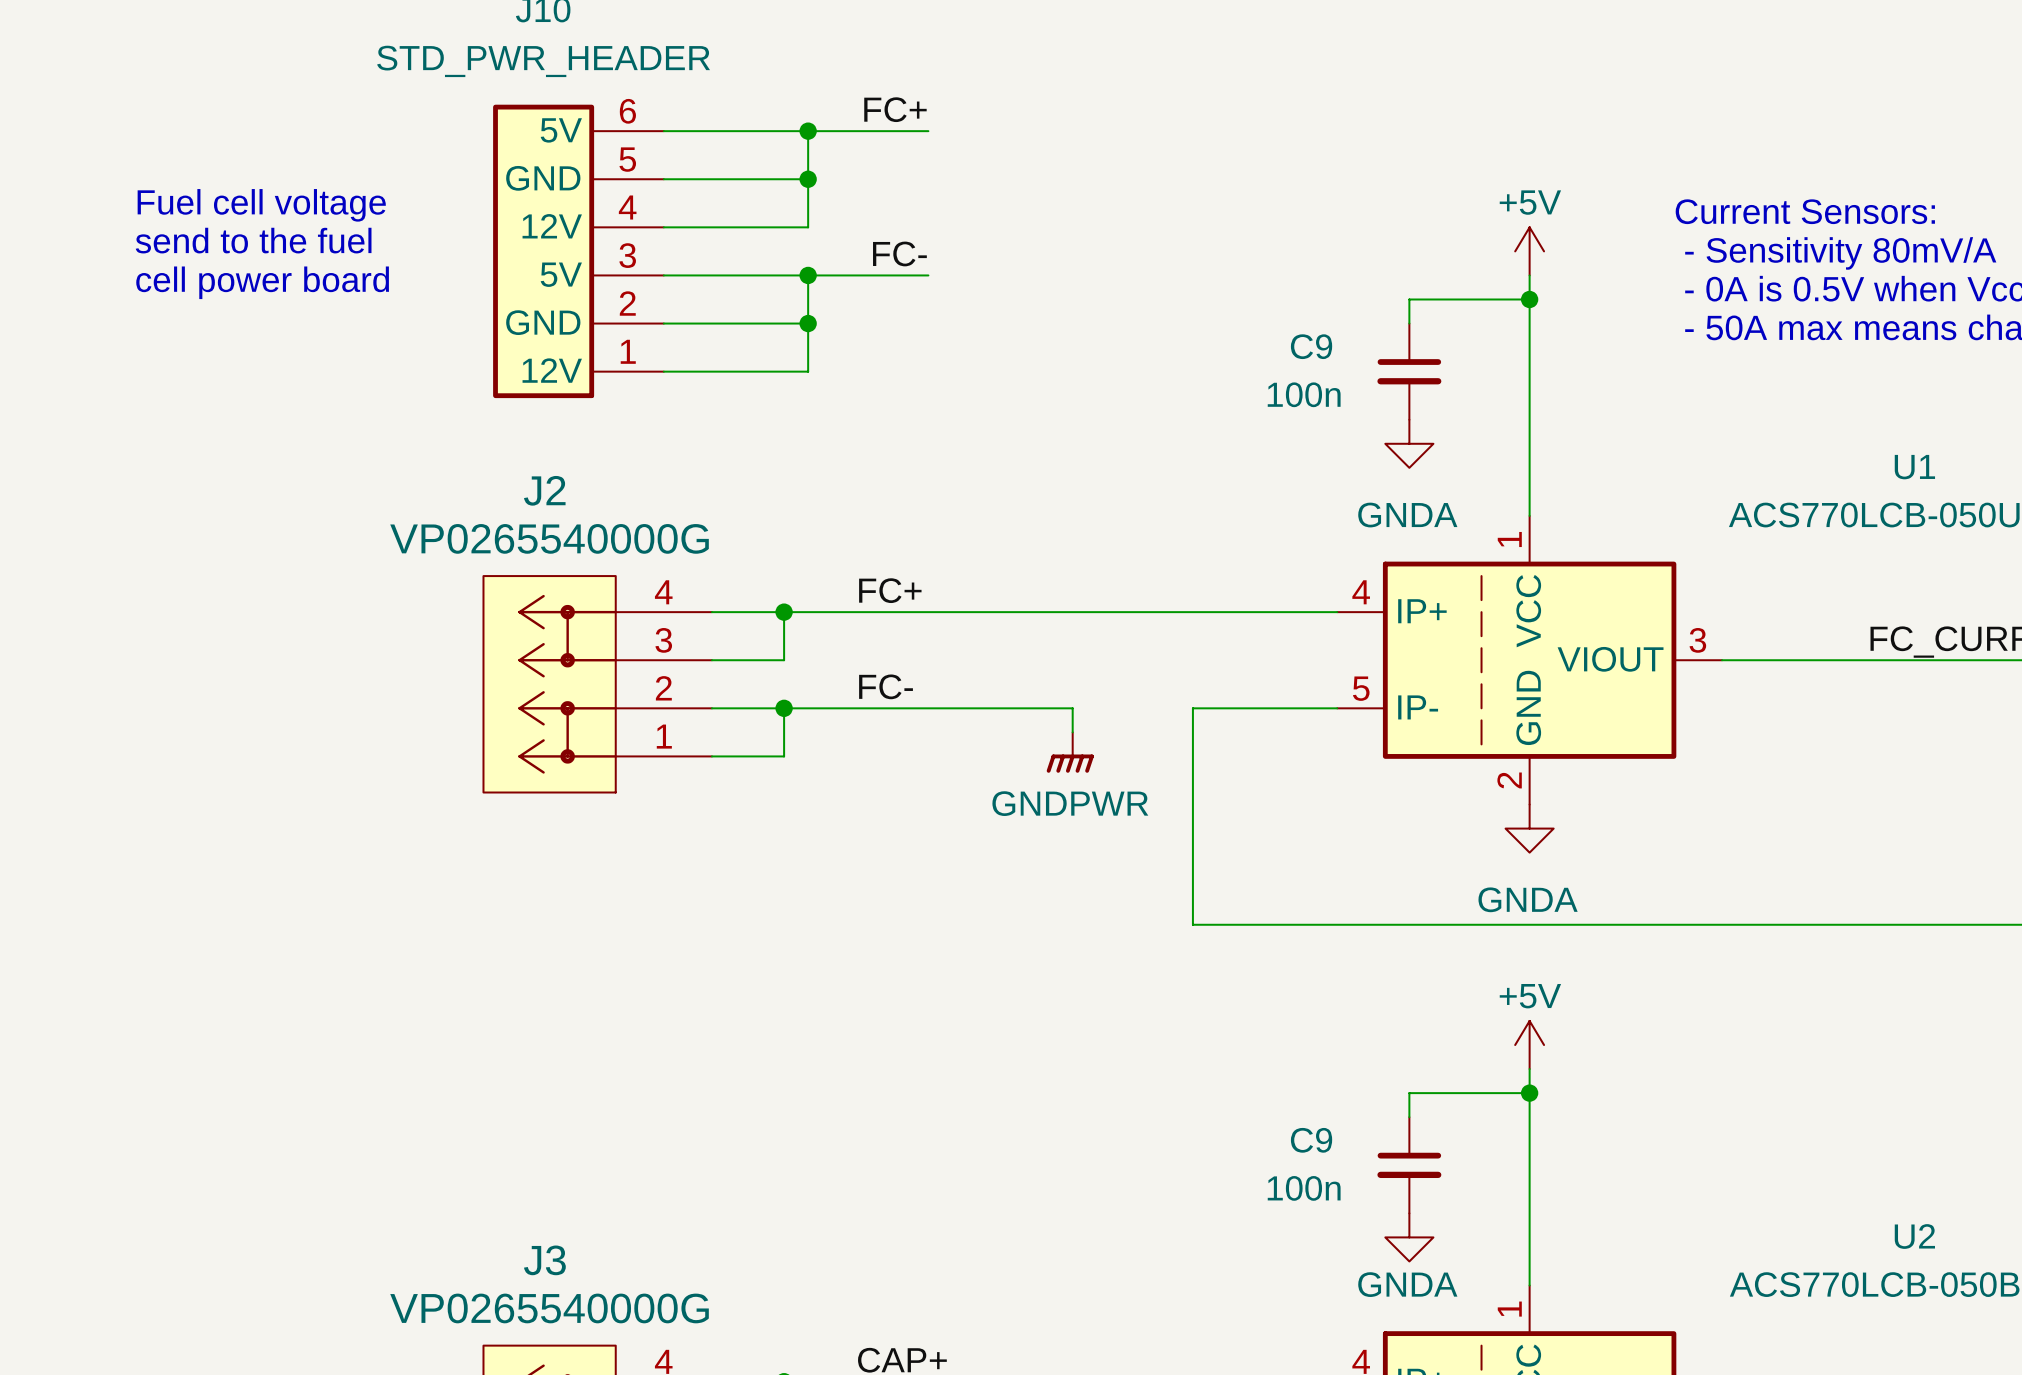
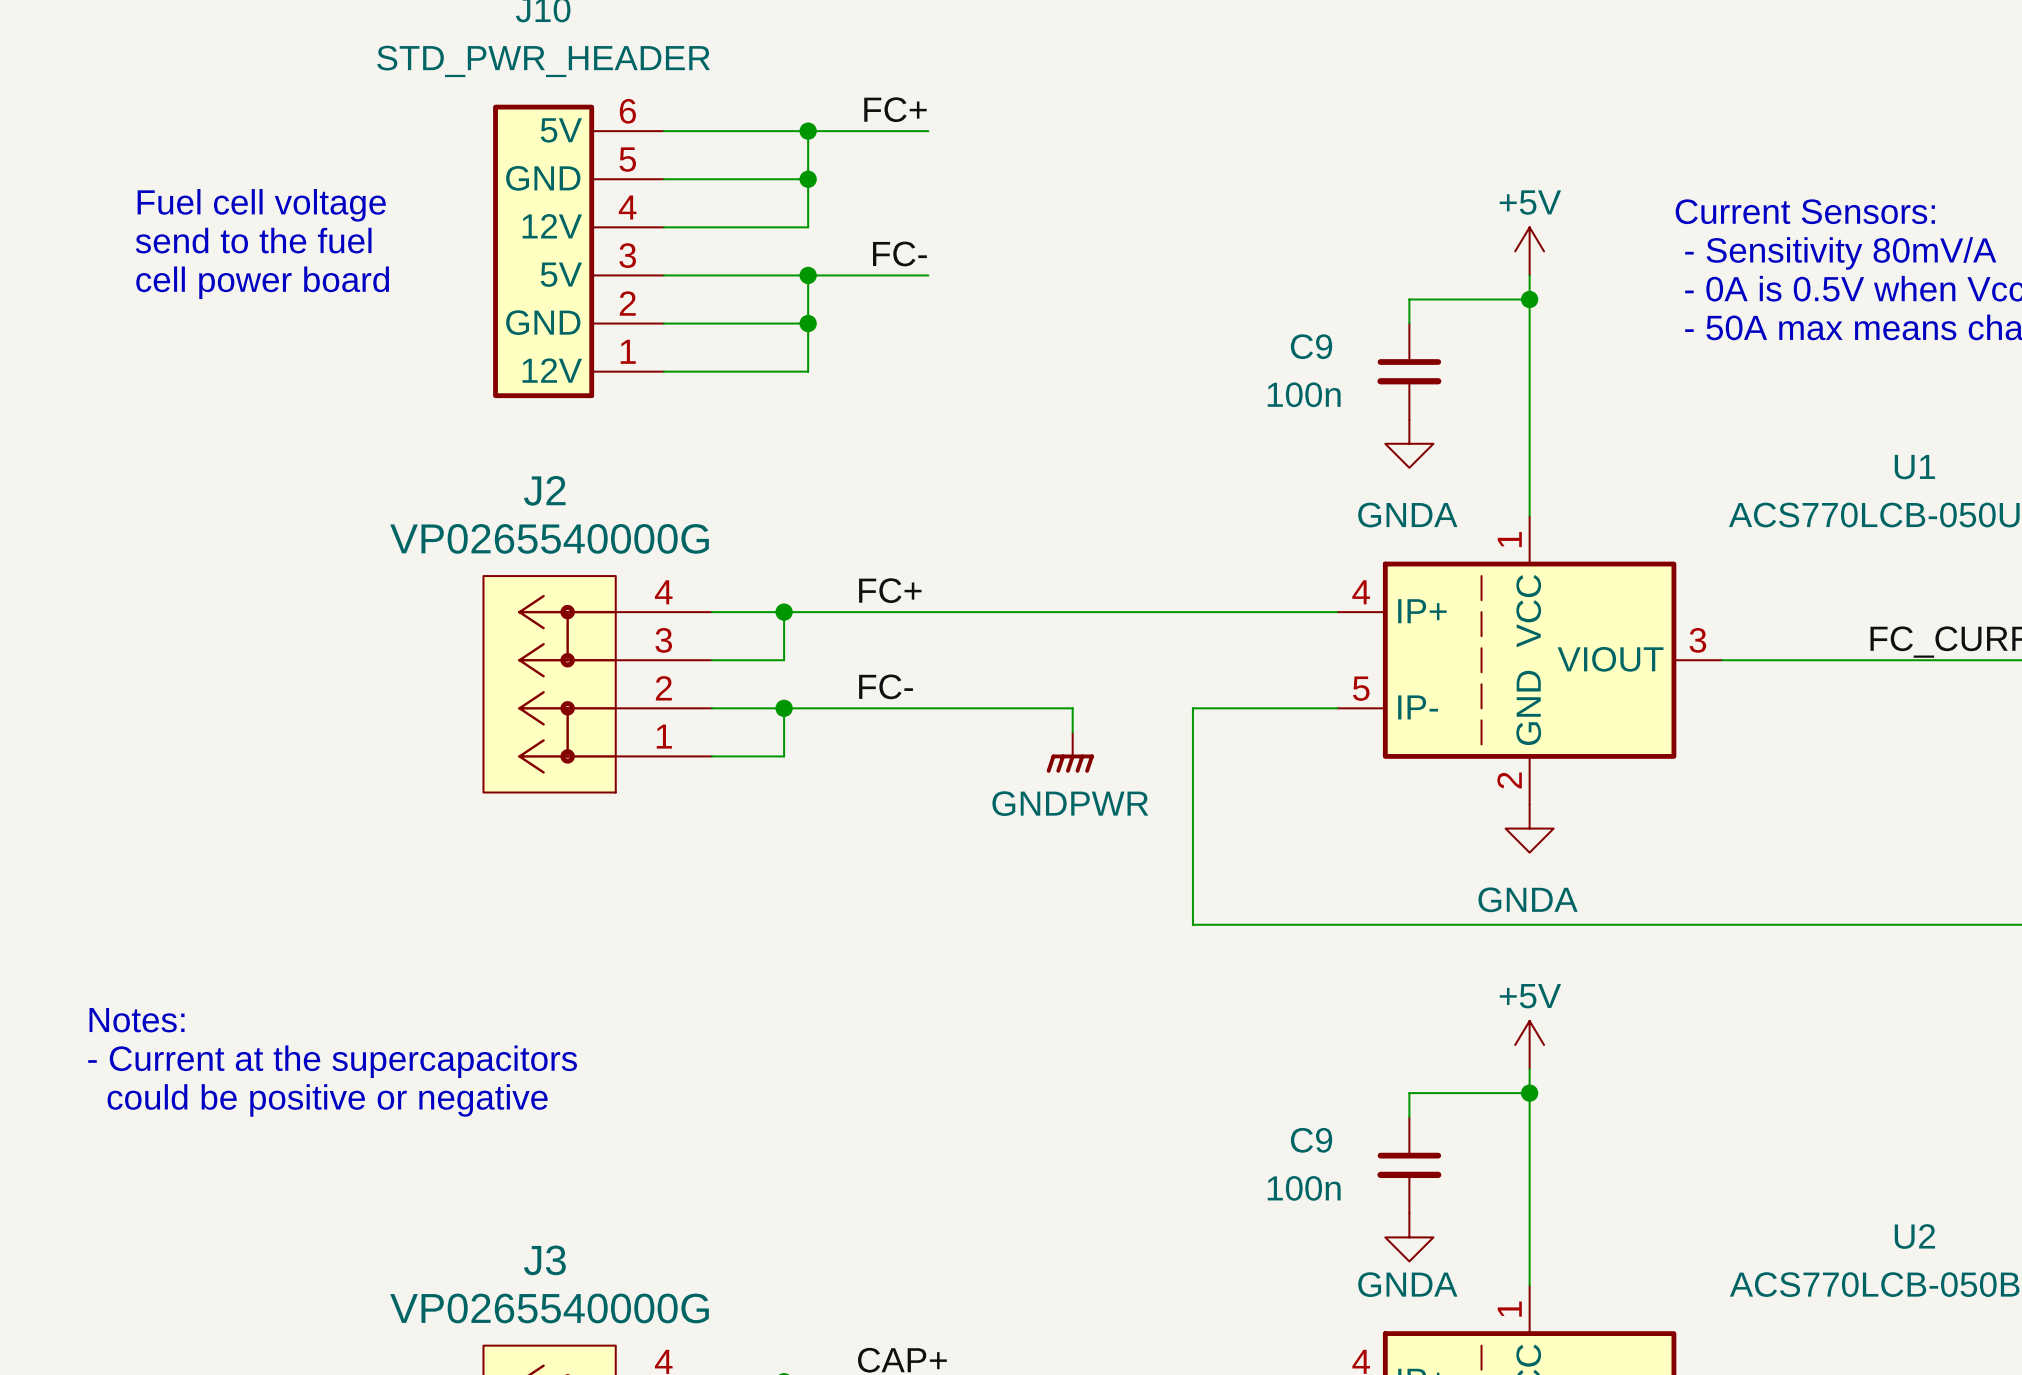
text: none -> Notes: (137, 1020)
text: none -> - Current at the supercapacitors (332, 1061)
text: none -> could be positive or negative (327, 1100)

